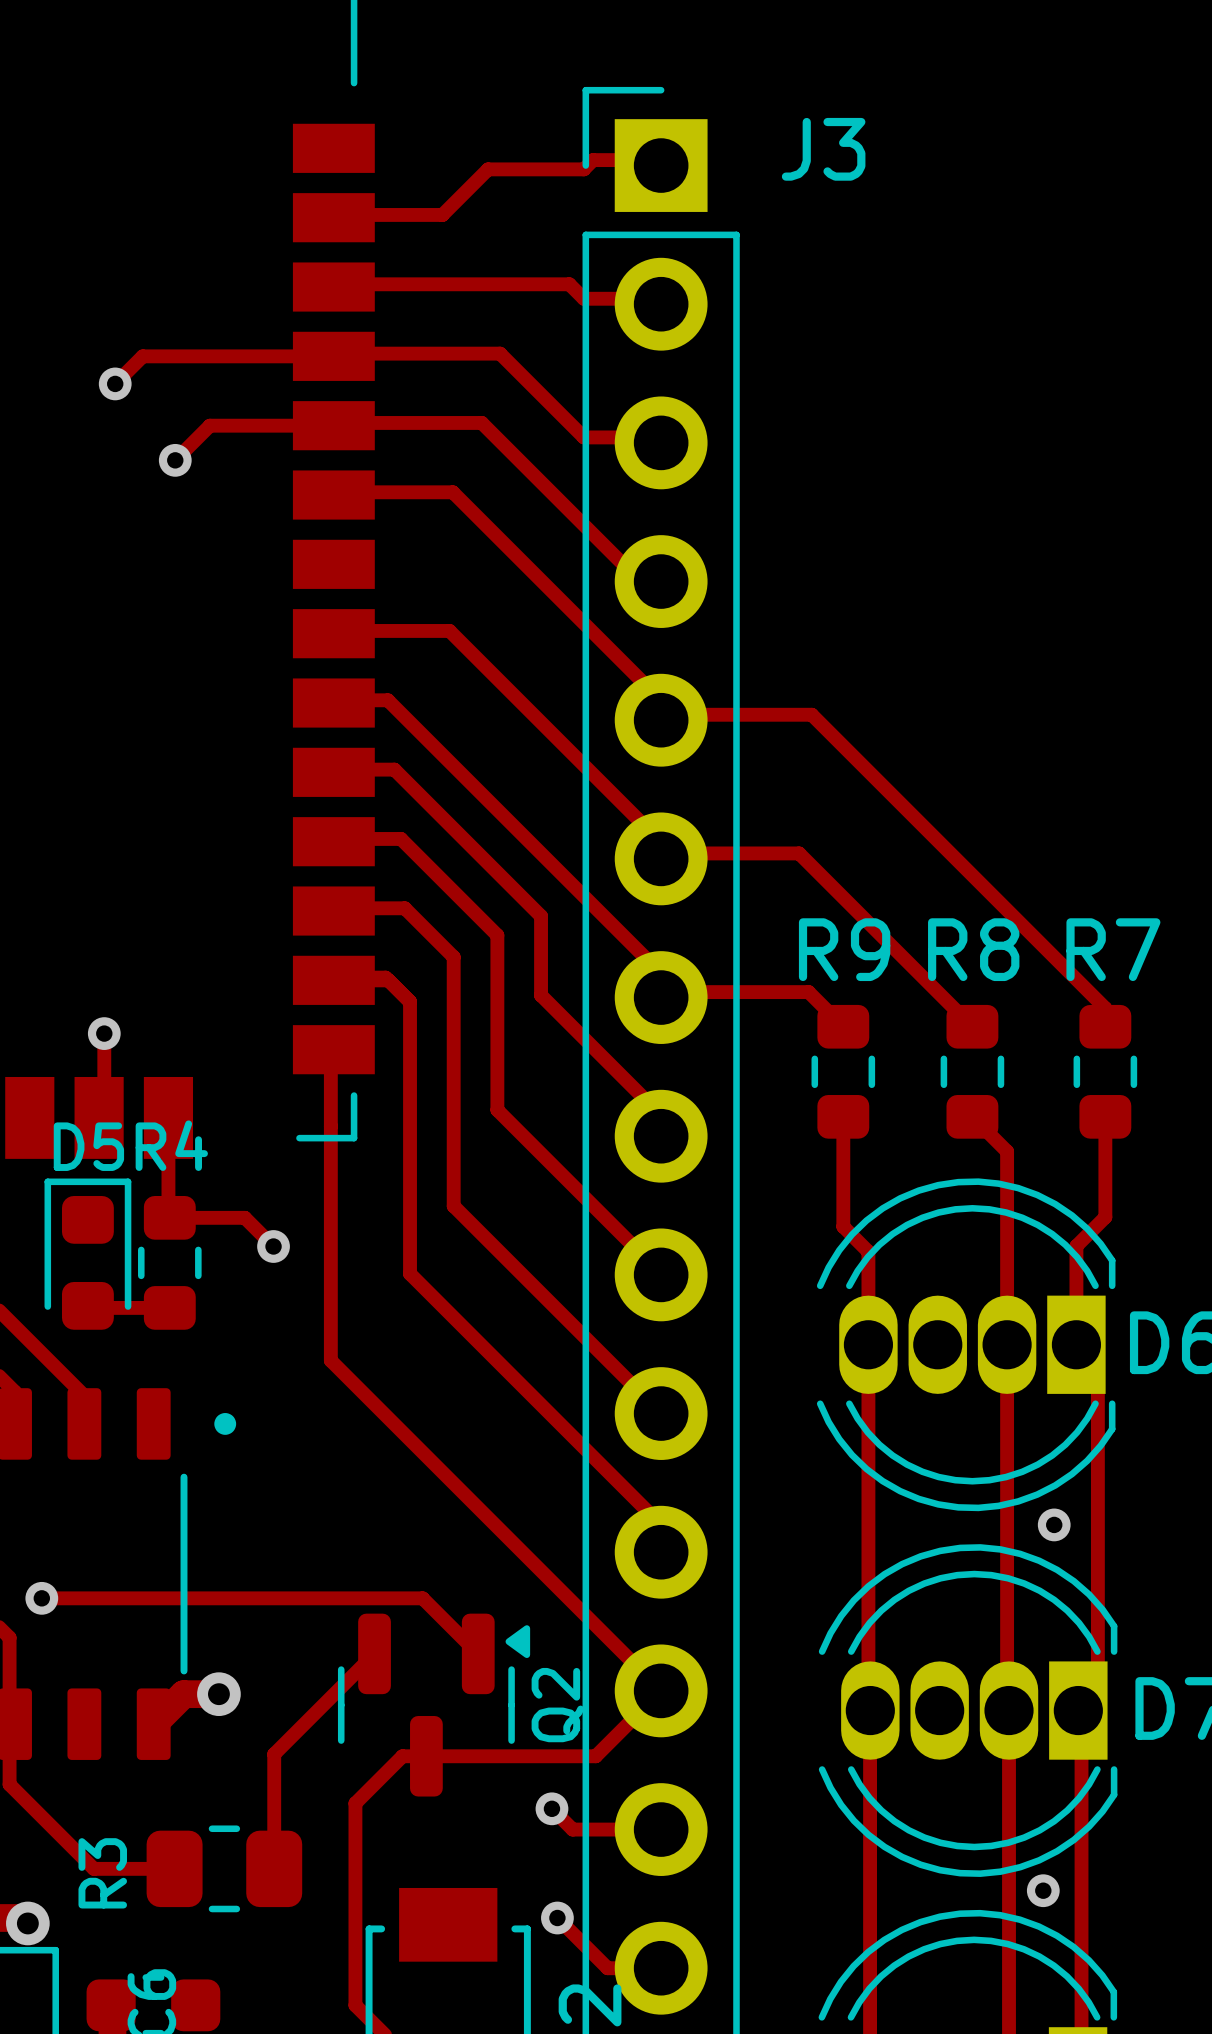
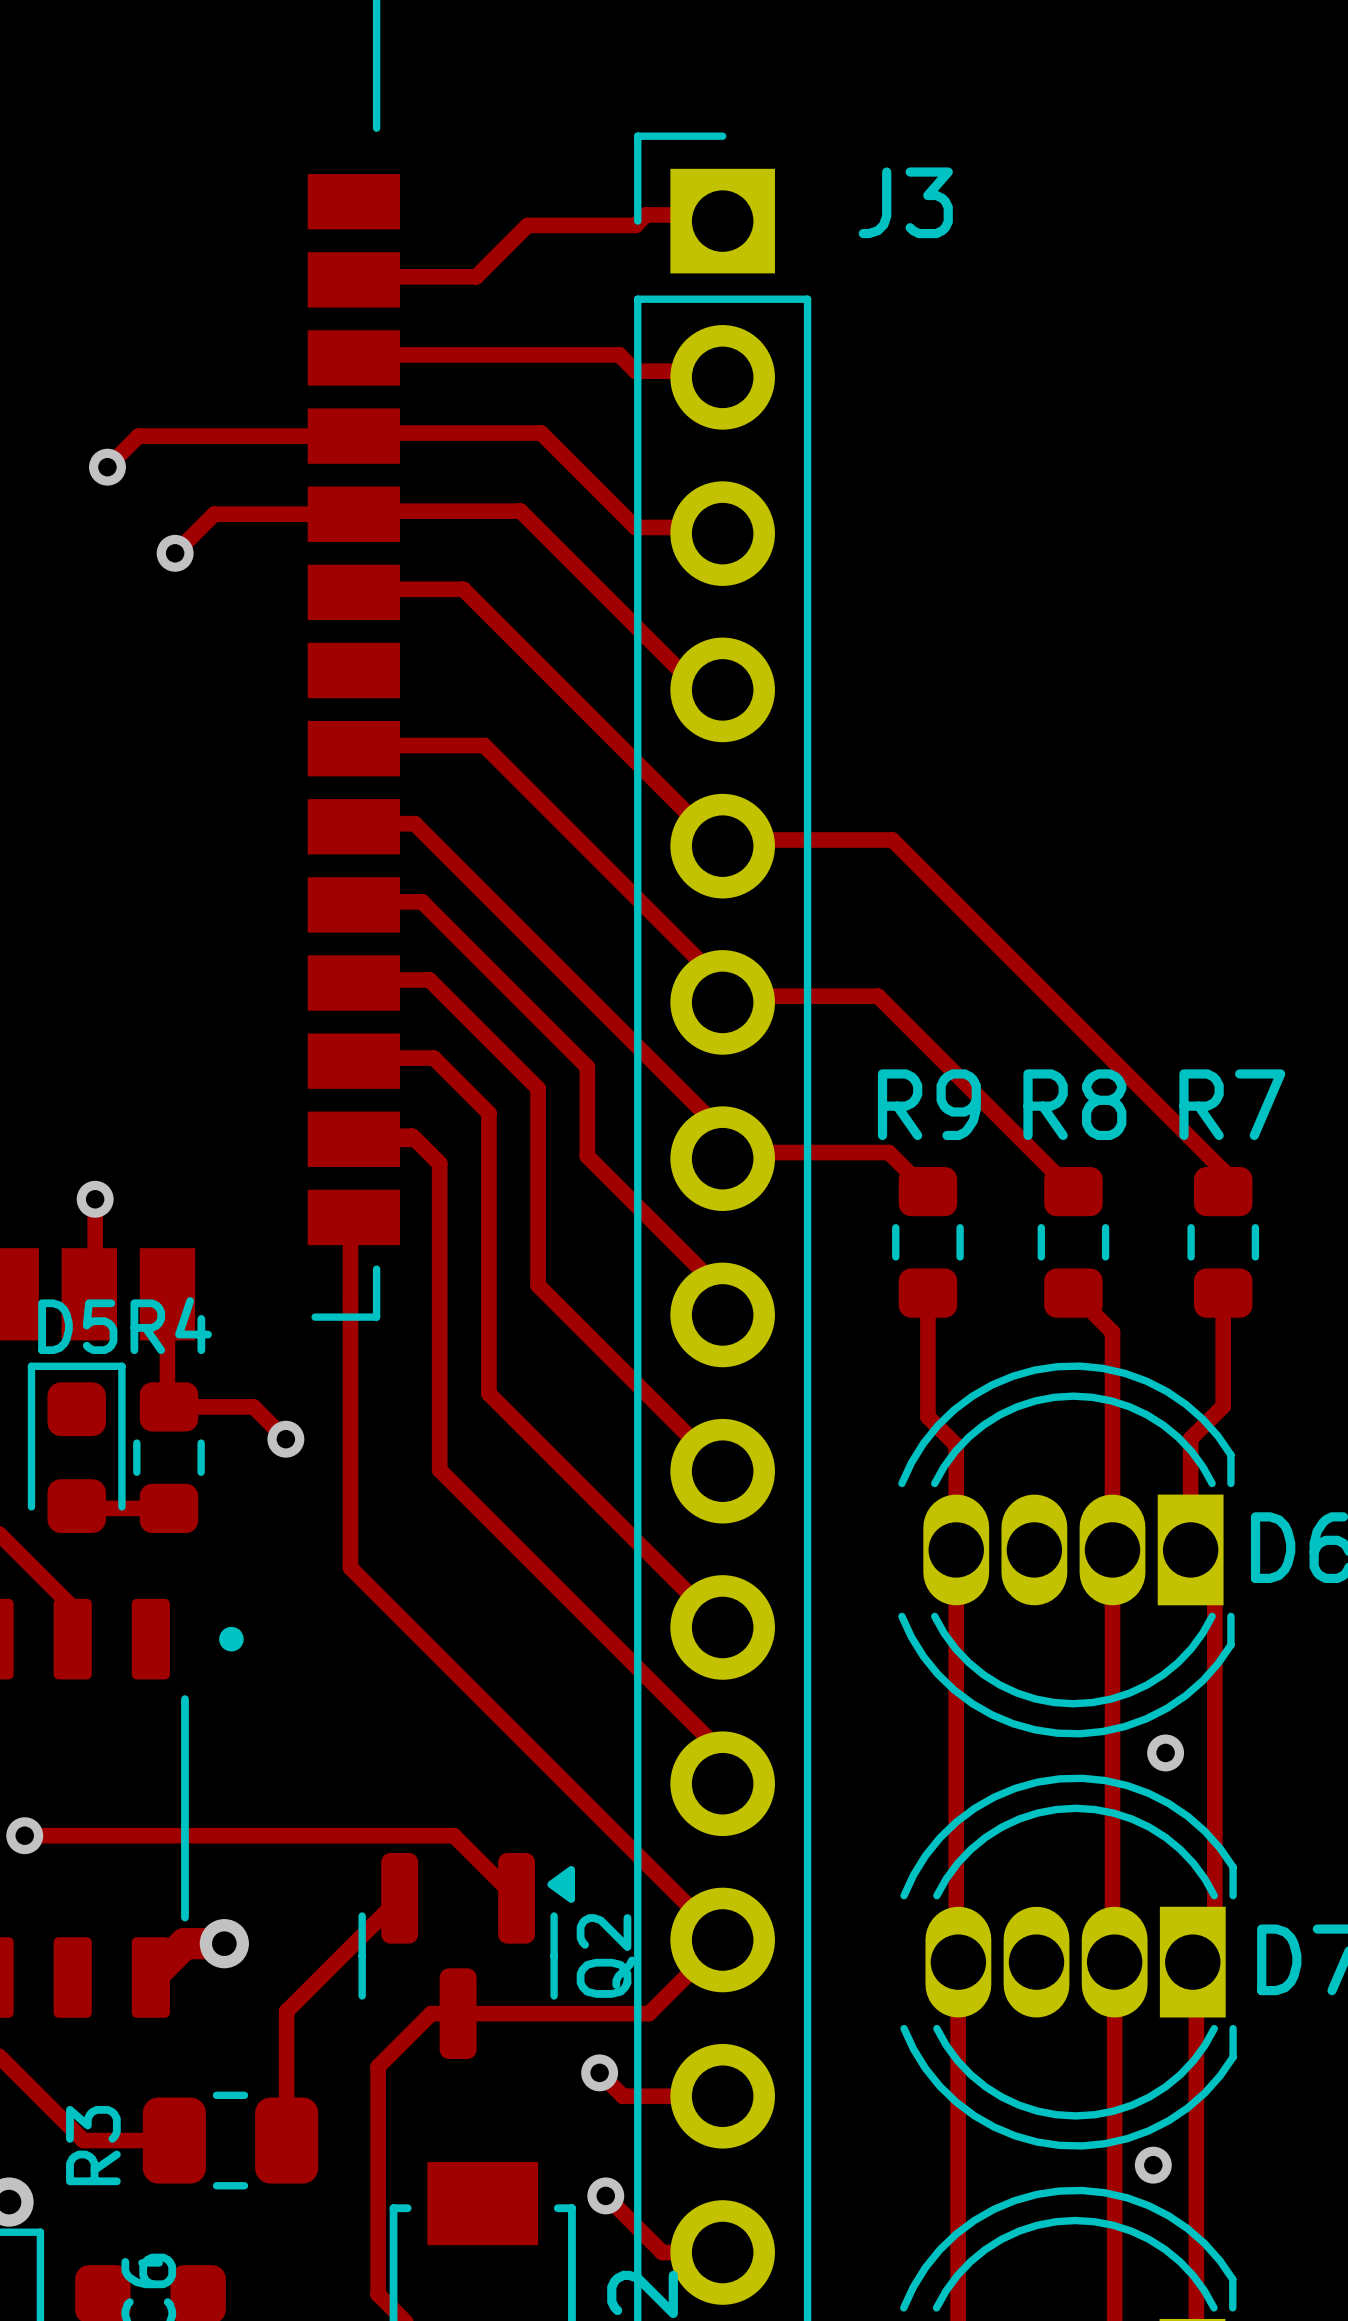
track: (431, 492) (452, 492) (663, 702) (663, 718) -> (463, 589) (717, 843) (724, 843)

